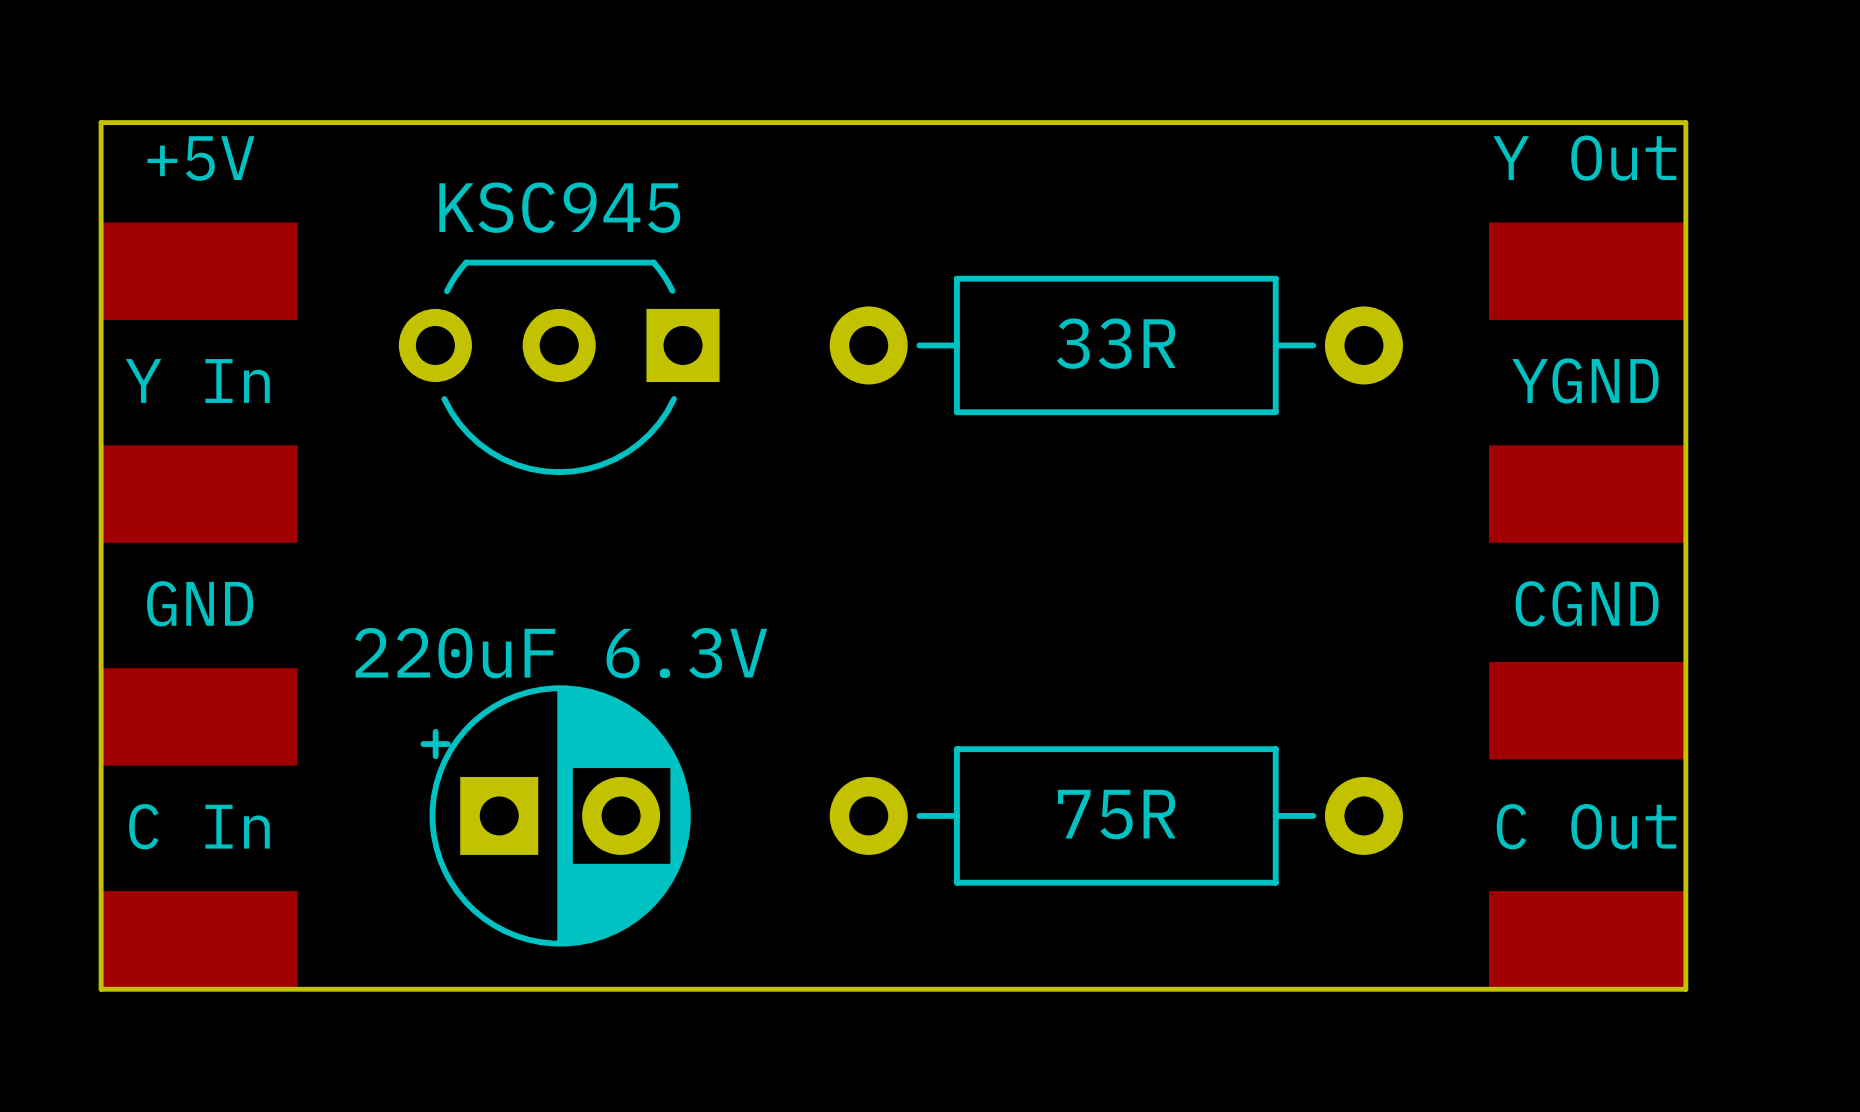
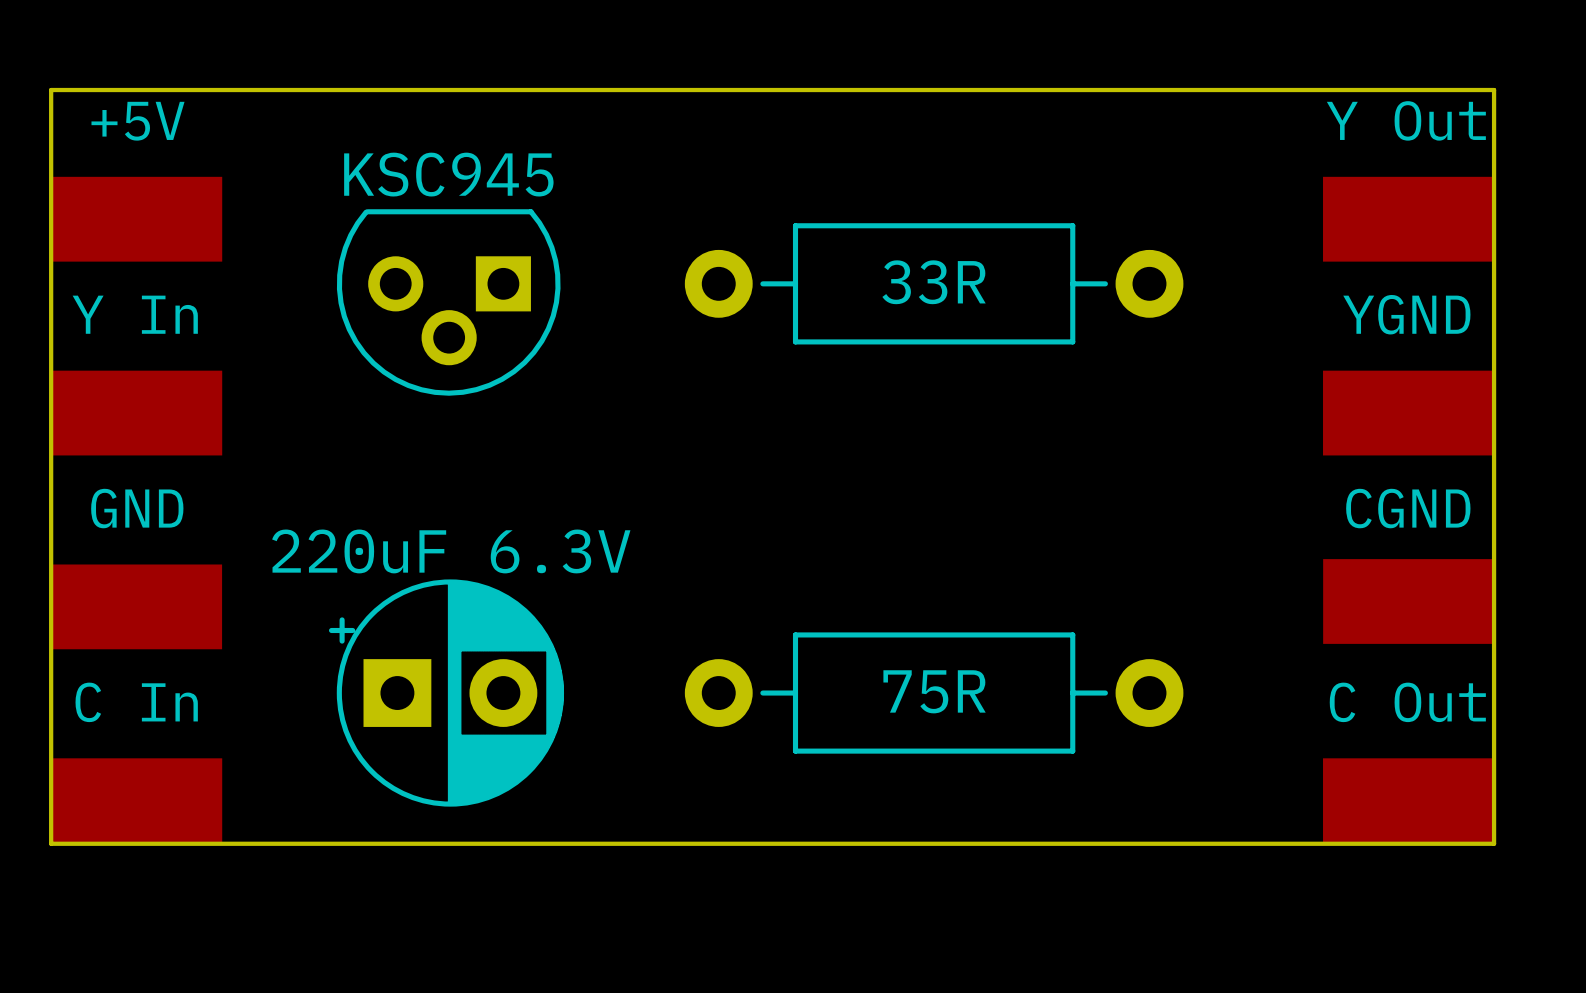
board edge: (1685, 122) (1685, 989) -> (1429, 90) (1494, 90) (1494, 843) (1429, 843)
part footprint: [398, 259, 720, 476] -> [336, 209, 561, 396]
part position: (1586, 271) -> (1407, 219)
part position: (1586, 494) -> (1407, 413)
part position: (1586, 710) -> (1408, 601)
part position: (1586, 939) -> (1407, 800)

